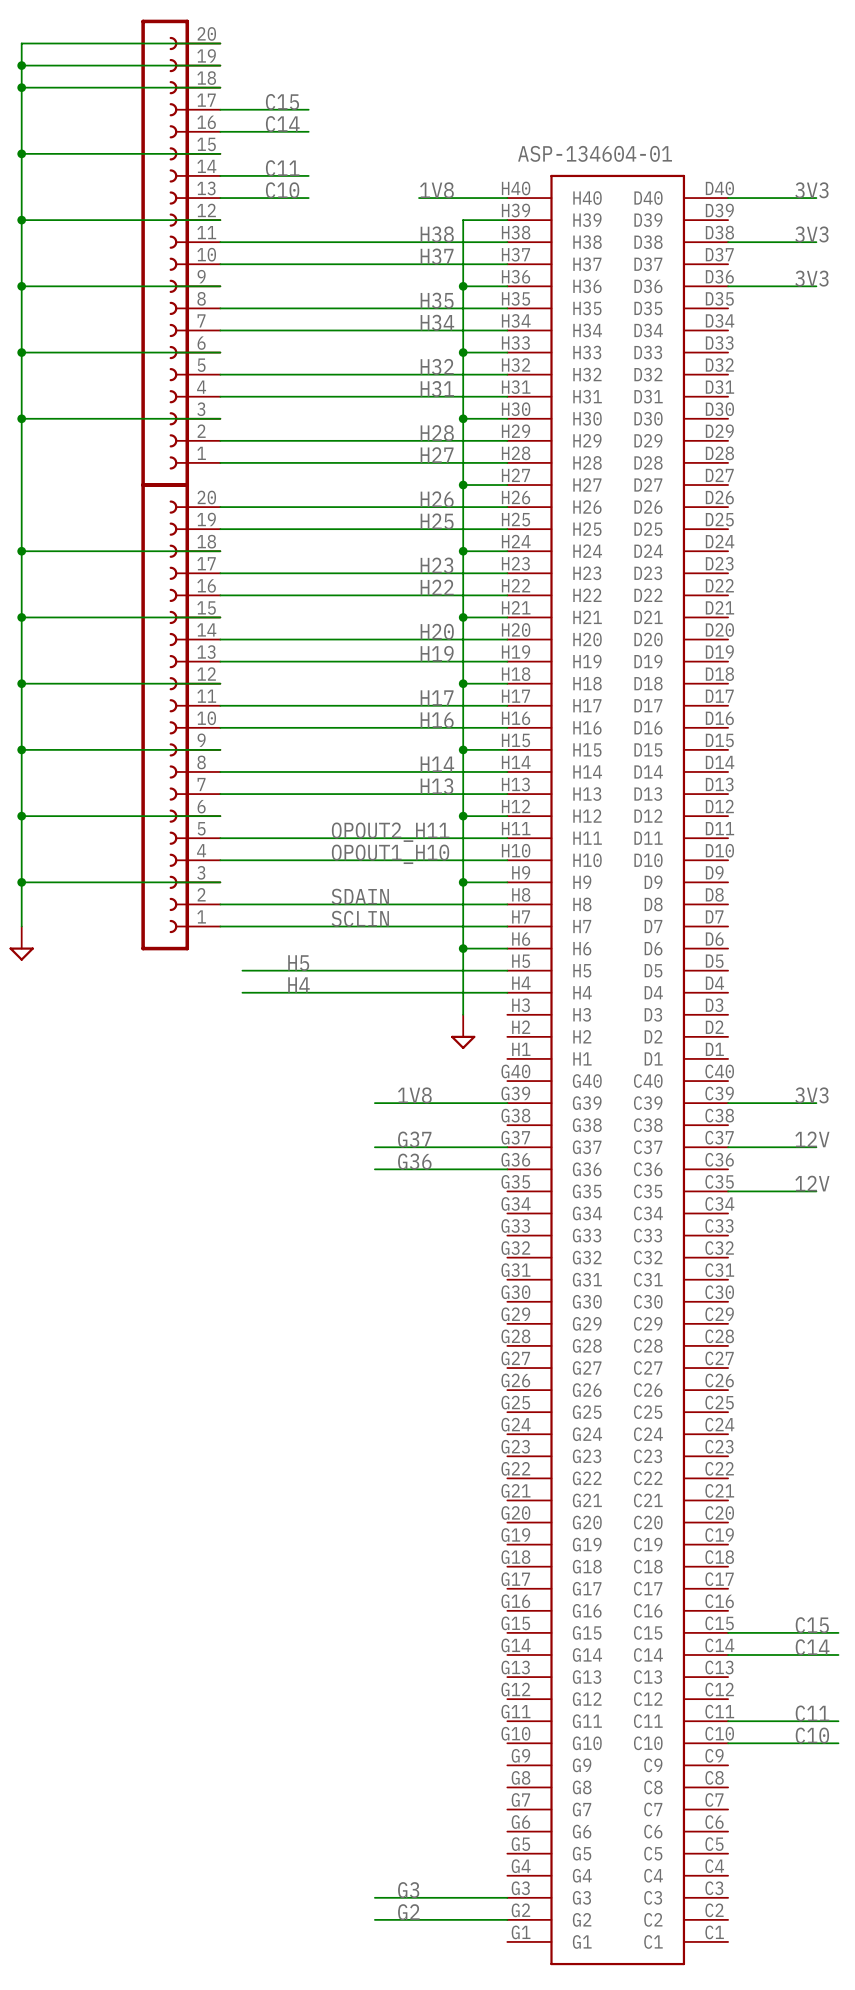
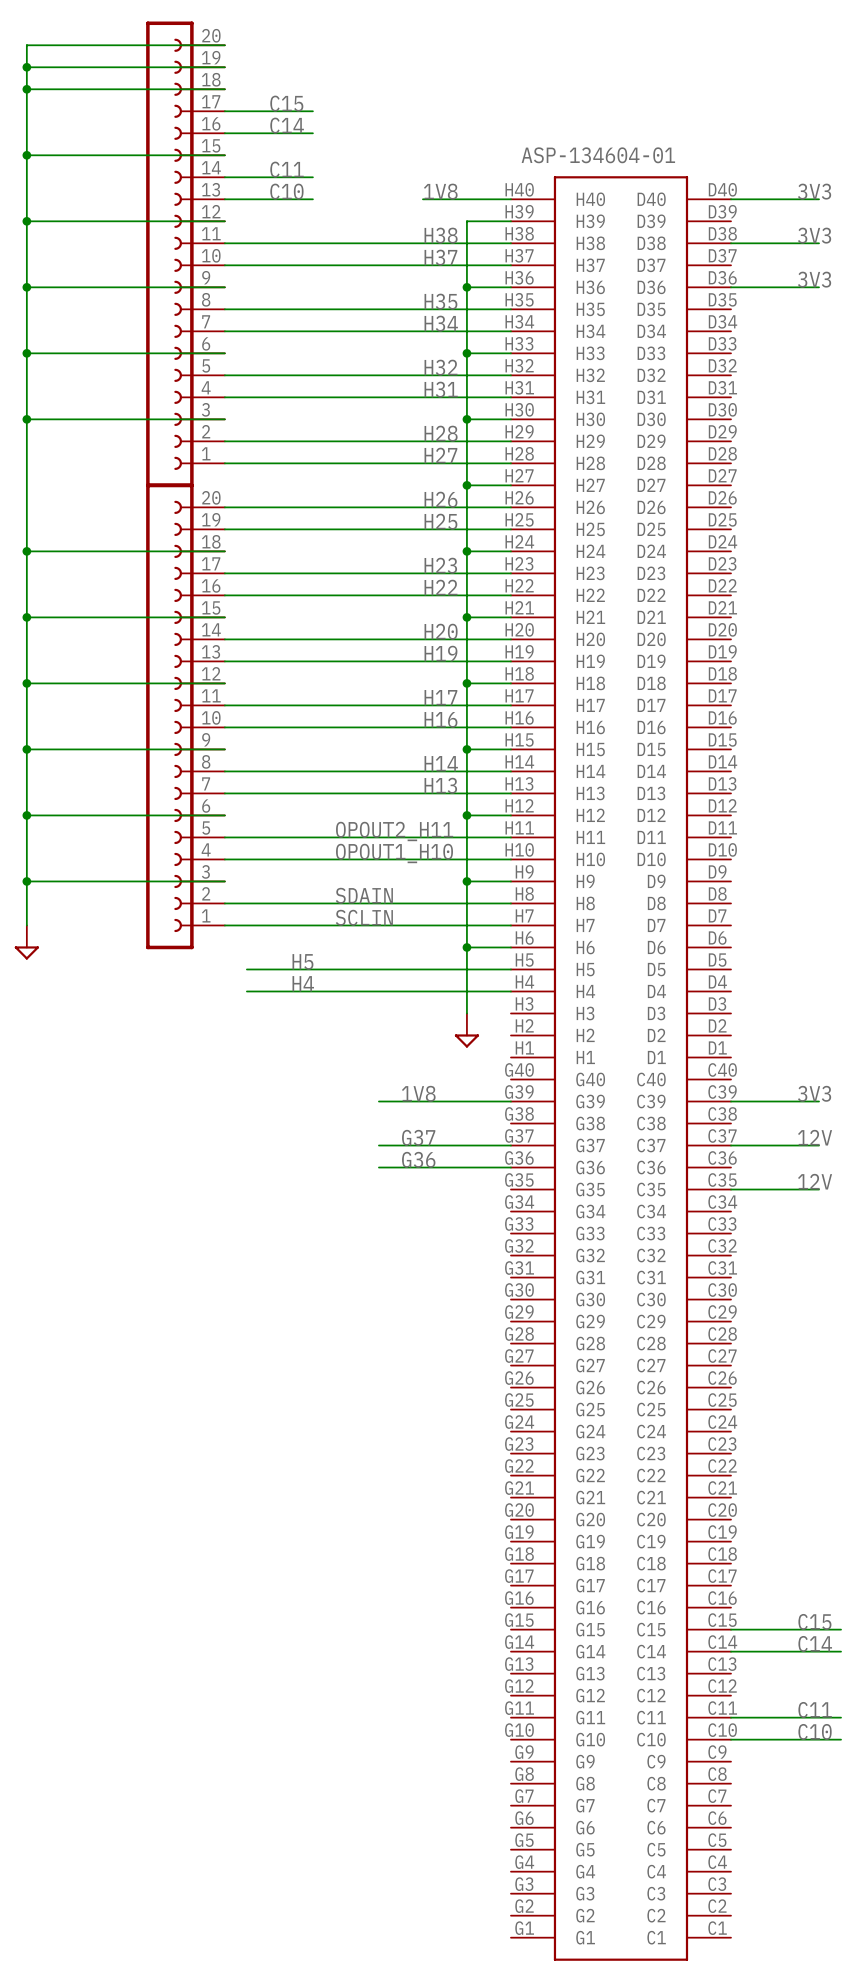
label: G3 (408, 1890) -> none
wire: (374, 1897) (507, 1897) -> none
label: G2 (408, 1912) -> none
wire: (374, 1919) (507, 1919) -> none

